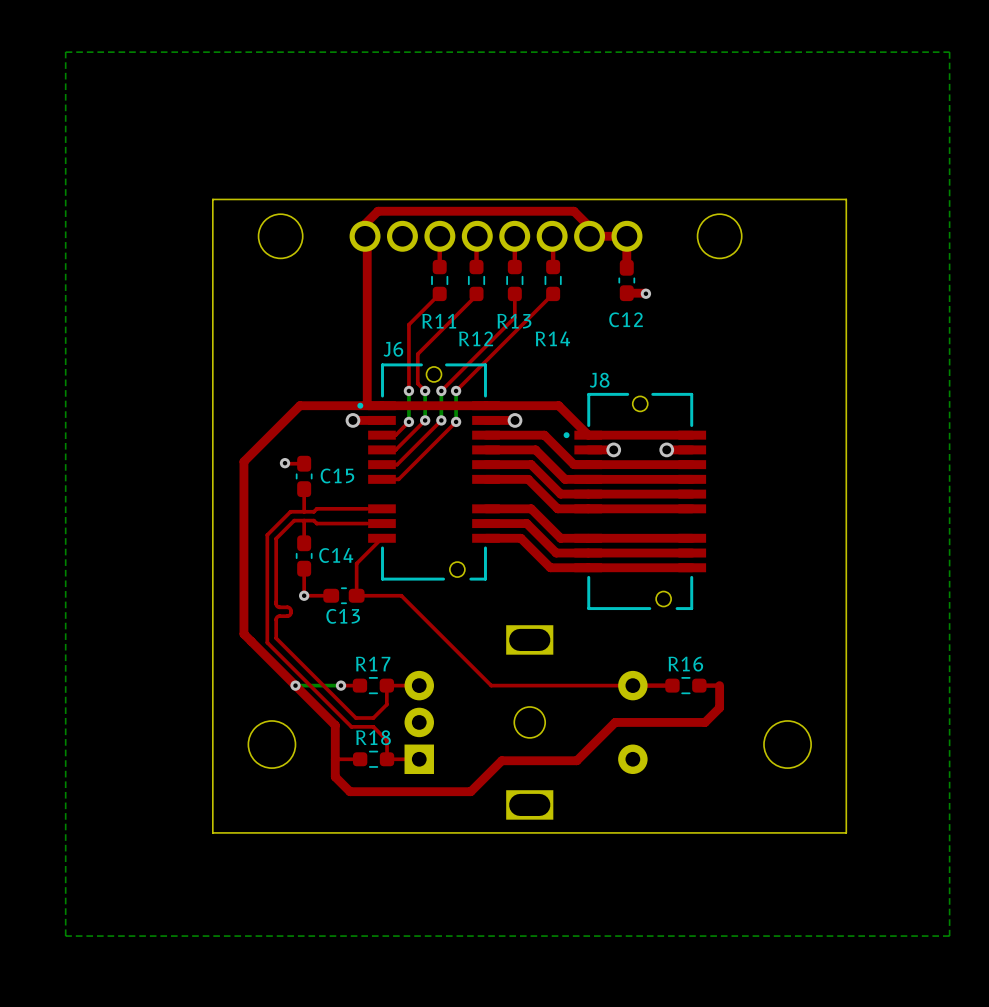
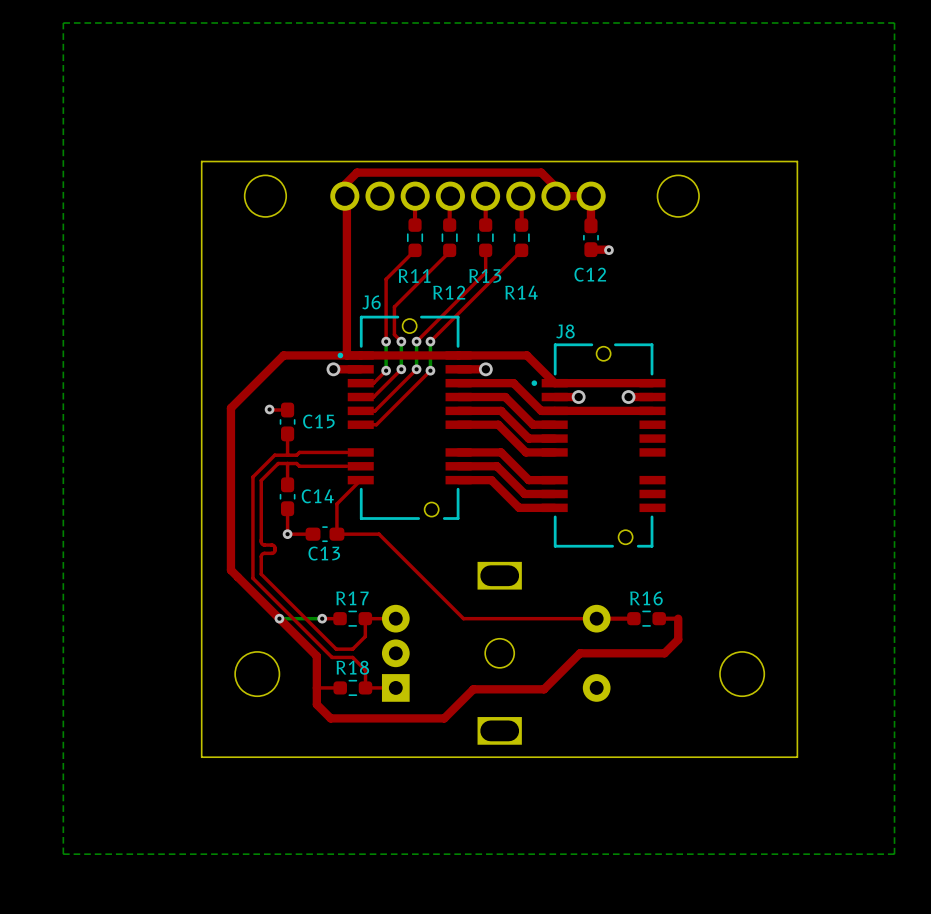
top track: (588, 479) (692, 479) -> none
top track: (588, 494) (692, 494) -> none
top track: (588, 508) (692, 508) -> none
top track: (588, 538) (692, 538) -> none
top track: (588, 553) (692, 553) -> none
top track: (588, 567) (692, 567) -> none

